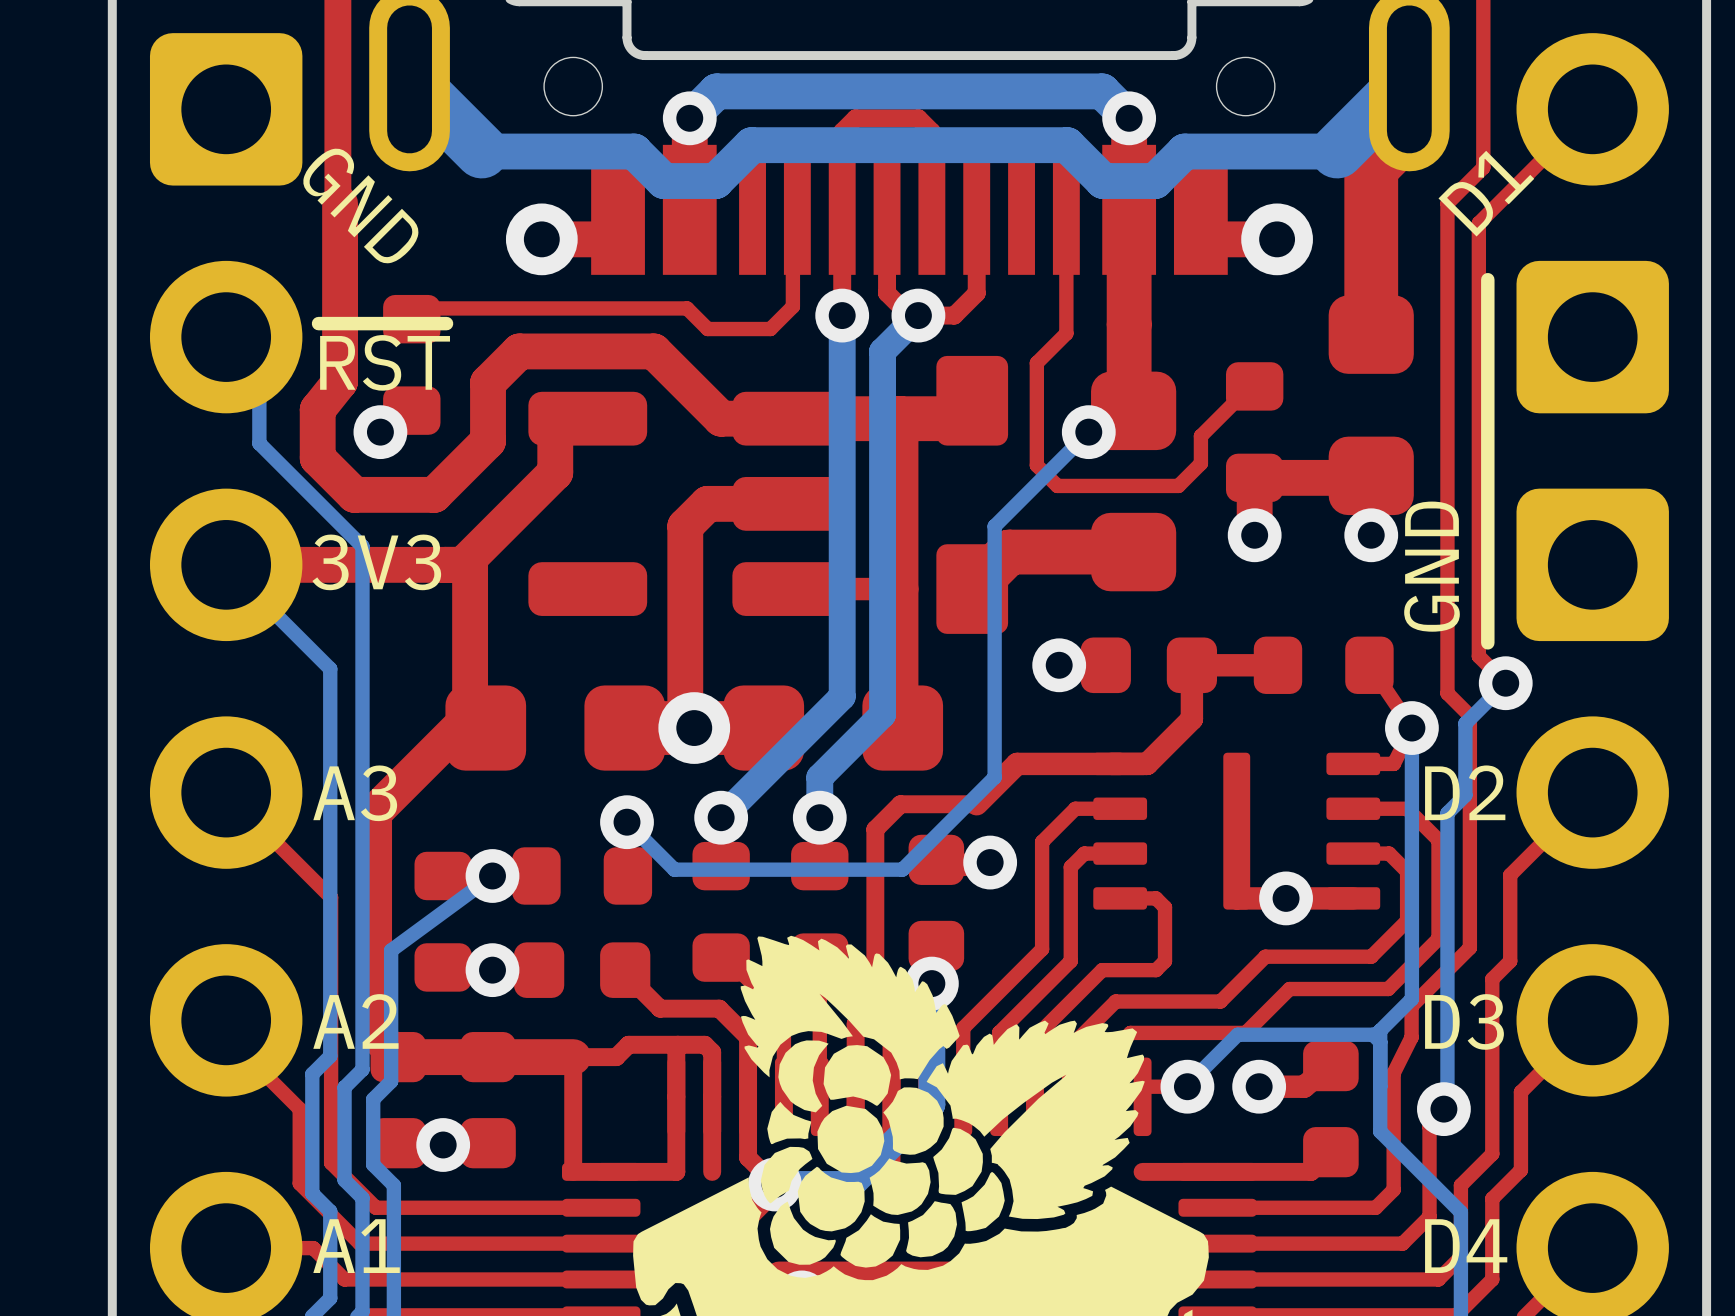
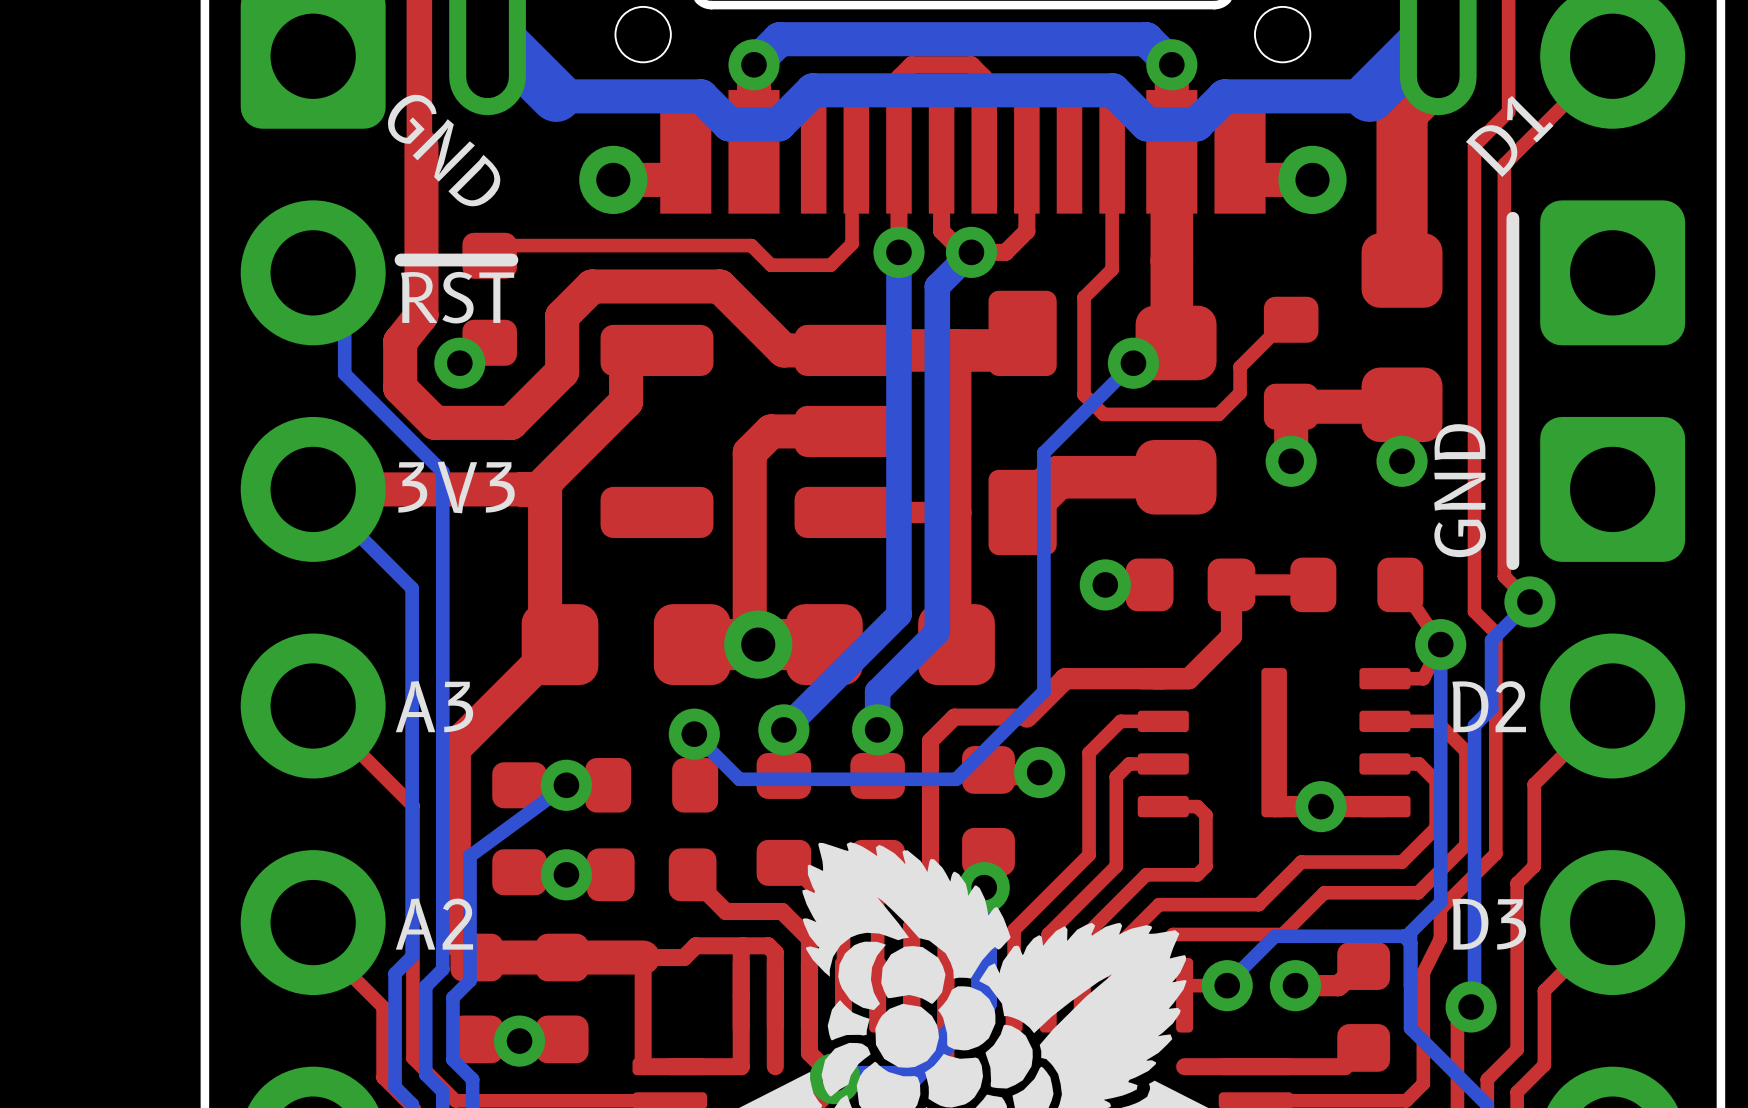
top track: (474, 712) (374, 812) (374, 837) -> (549, 629) (549, 653) (453, 748)

